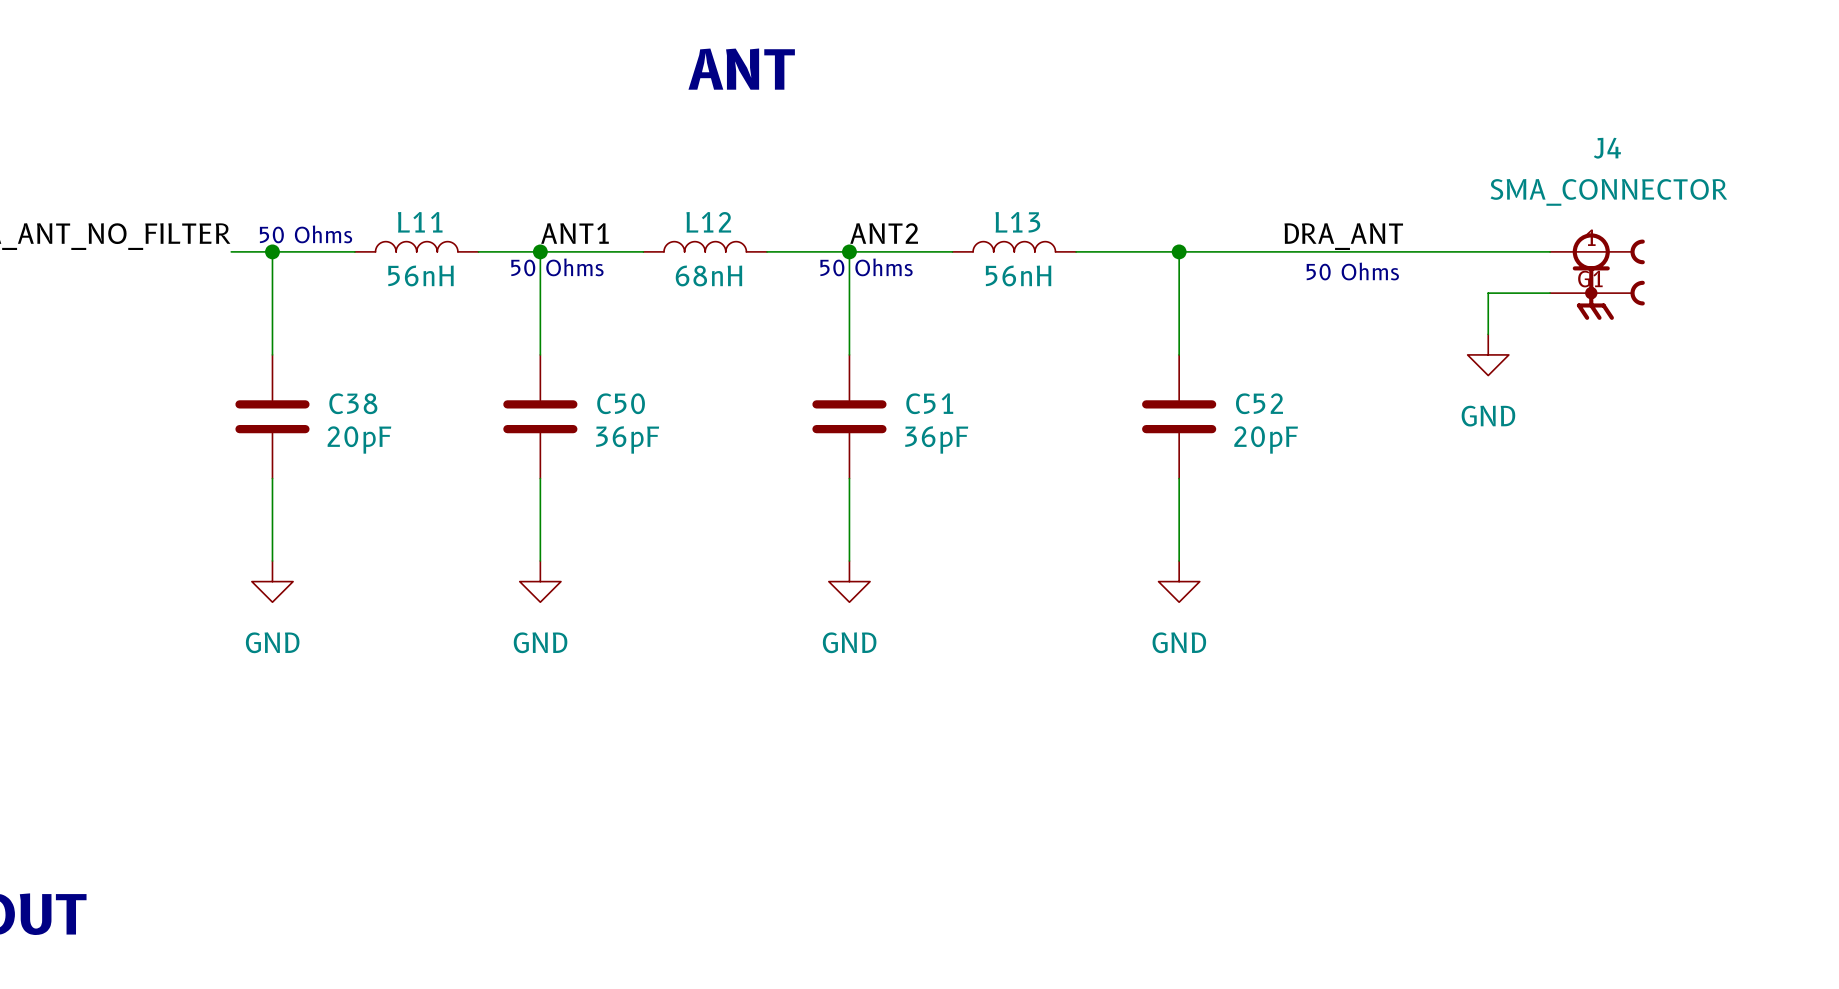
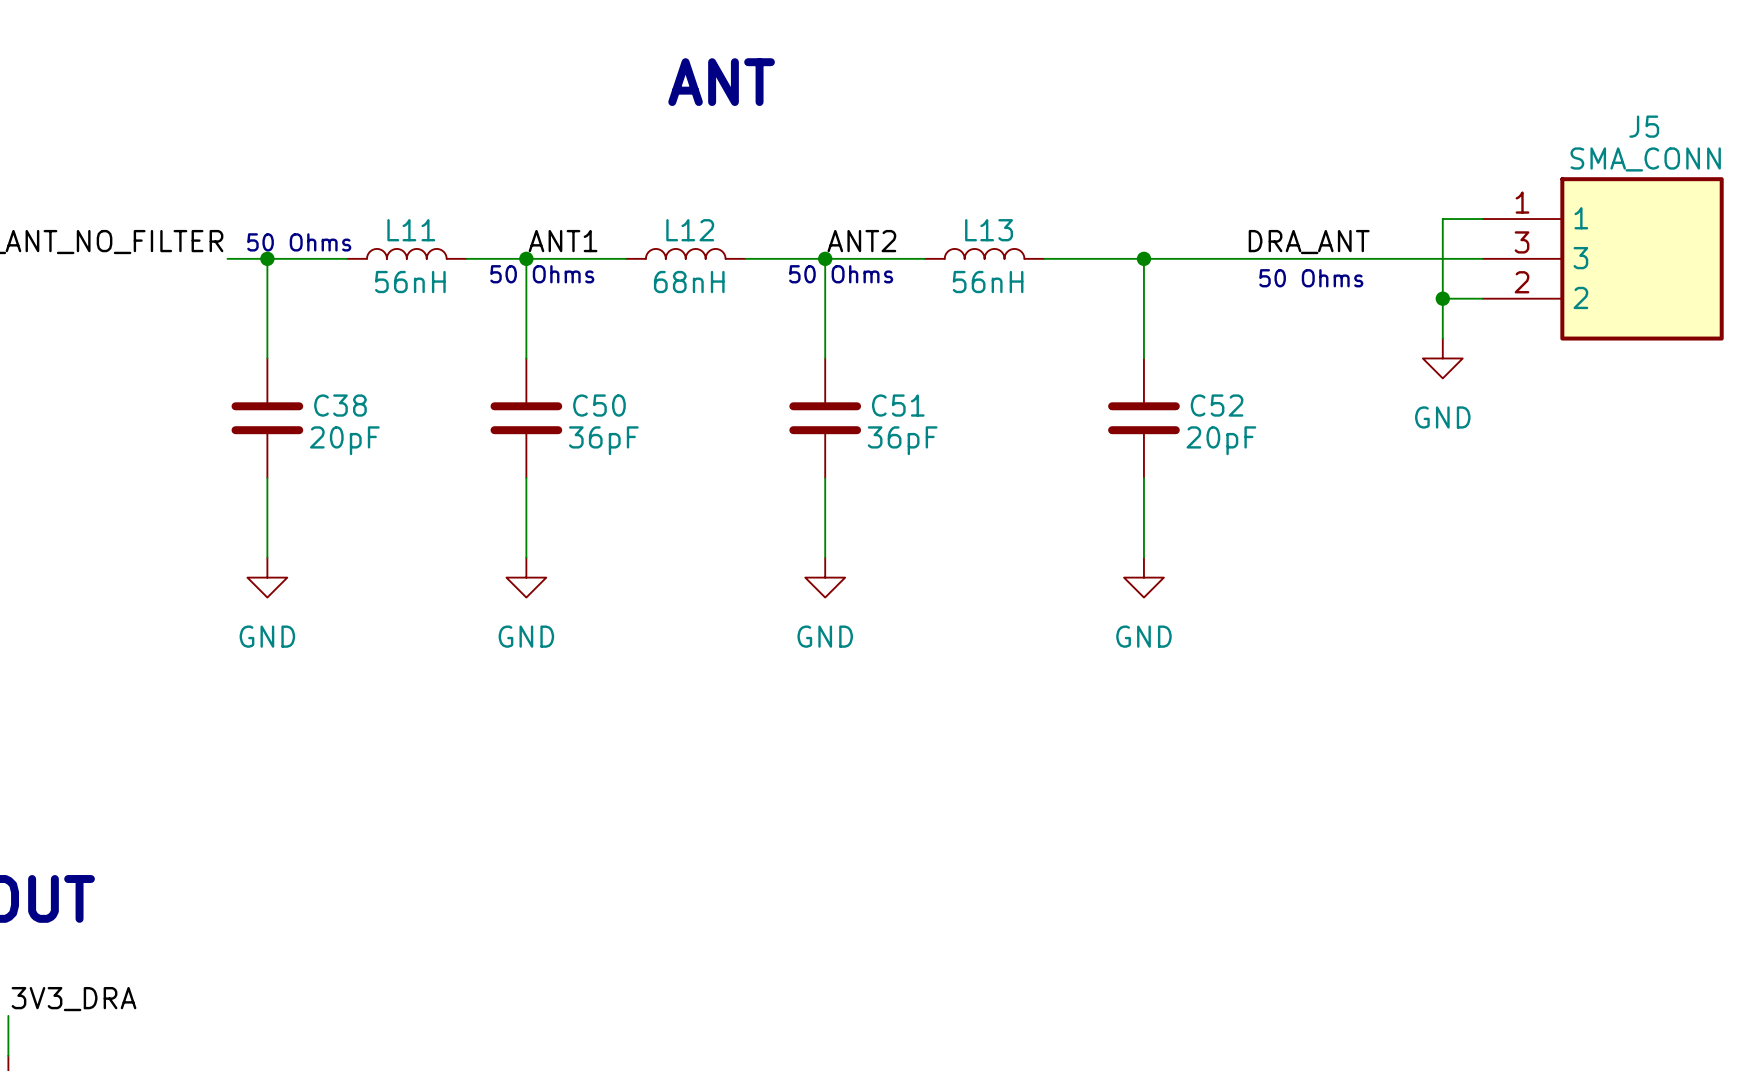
wire: none -> (1482, 219) (1442, 219) (1442, 298)
J5: none -> SMA_CONN (1603, 258)
J4: SMA_CONNECTOR (1597, 276) -> none
junction: none -> (1442, 298)

